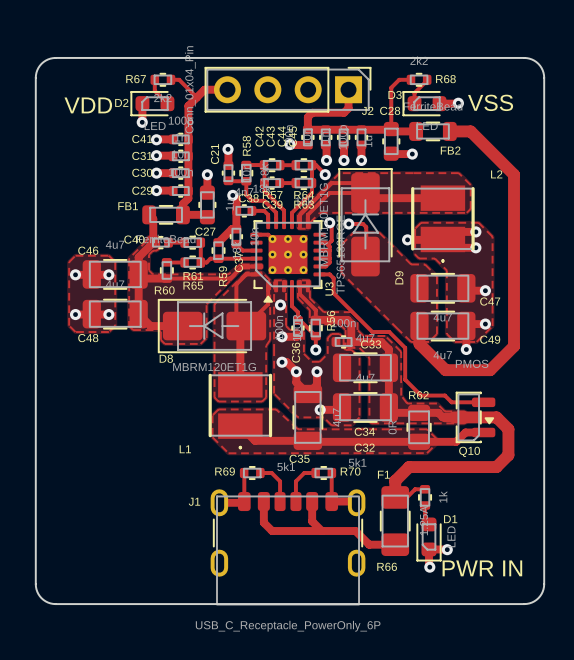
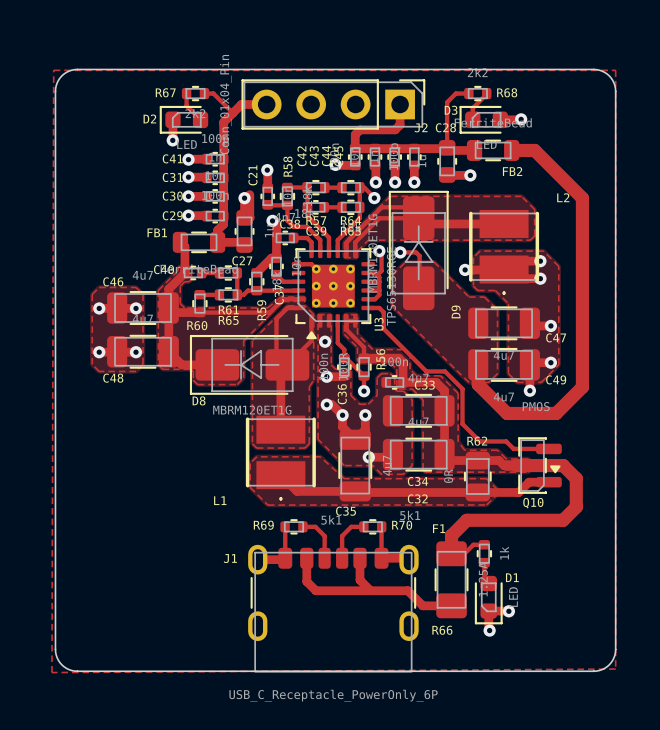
zone outline: none -> (53, 70) (615, 70) (615, 669) (51, 672) (53, 70)
text: VSS (490, 102) -> none
text: VDD (88, 105) -> none
track: none -> (249, 194) (250, 217)
text: PWR IN (482, 568) -> none

